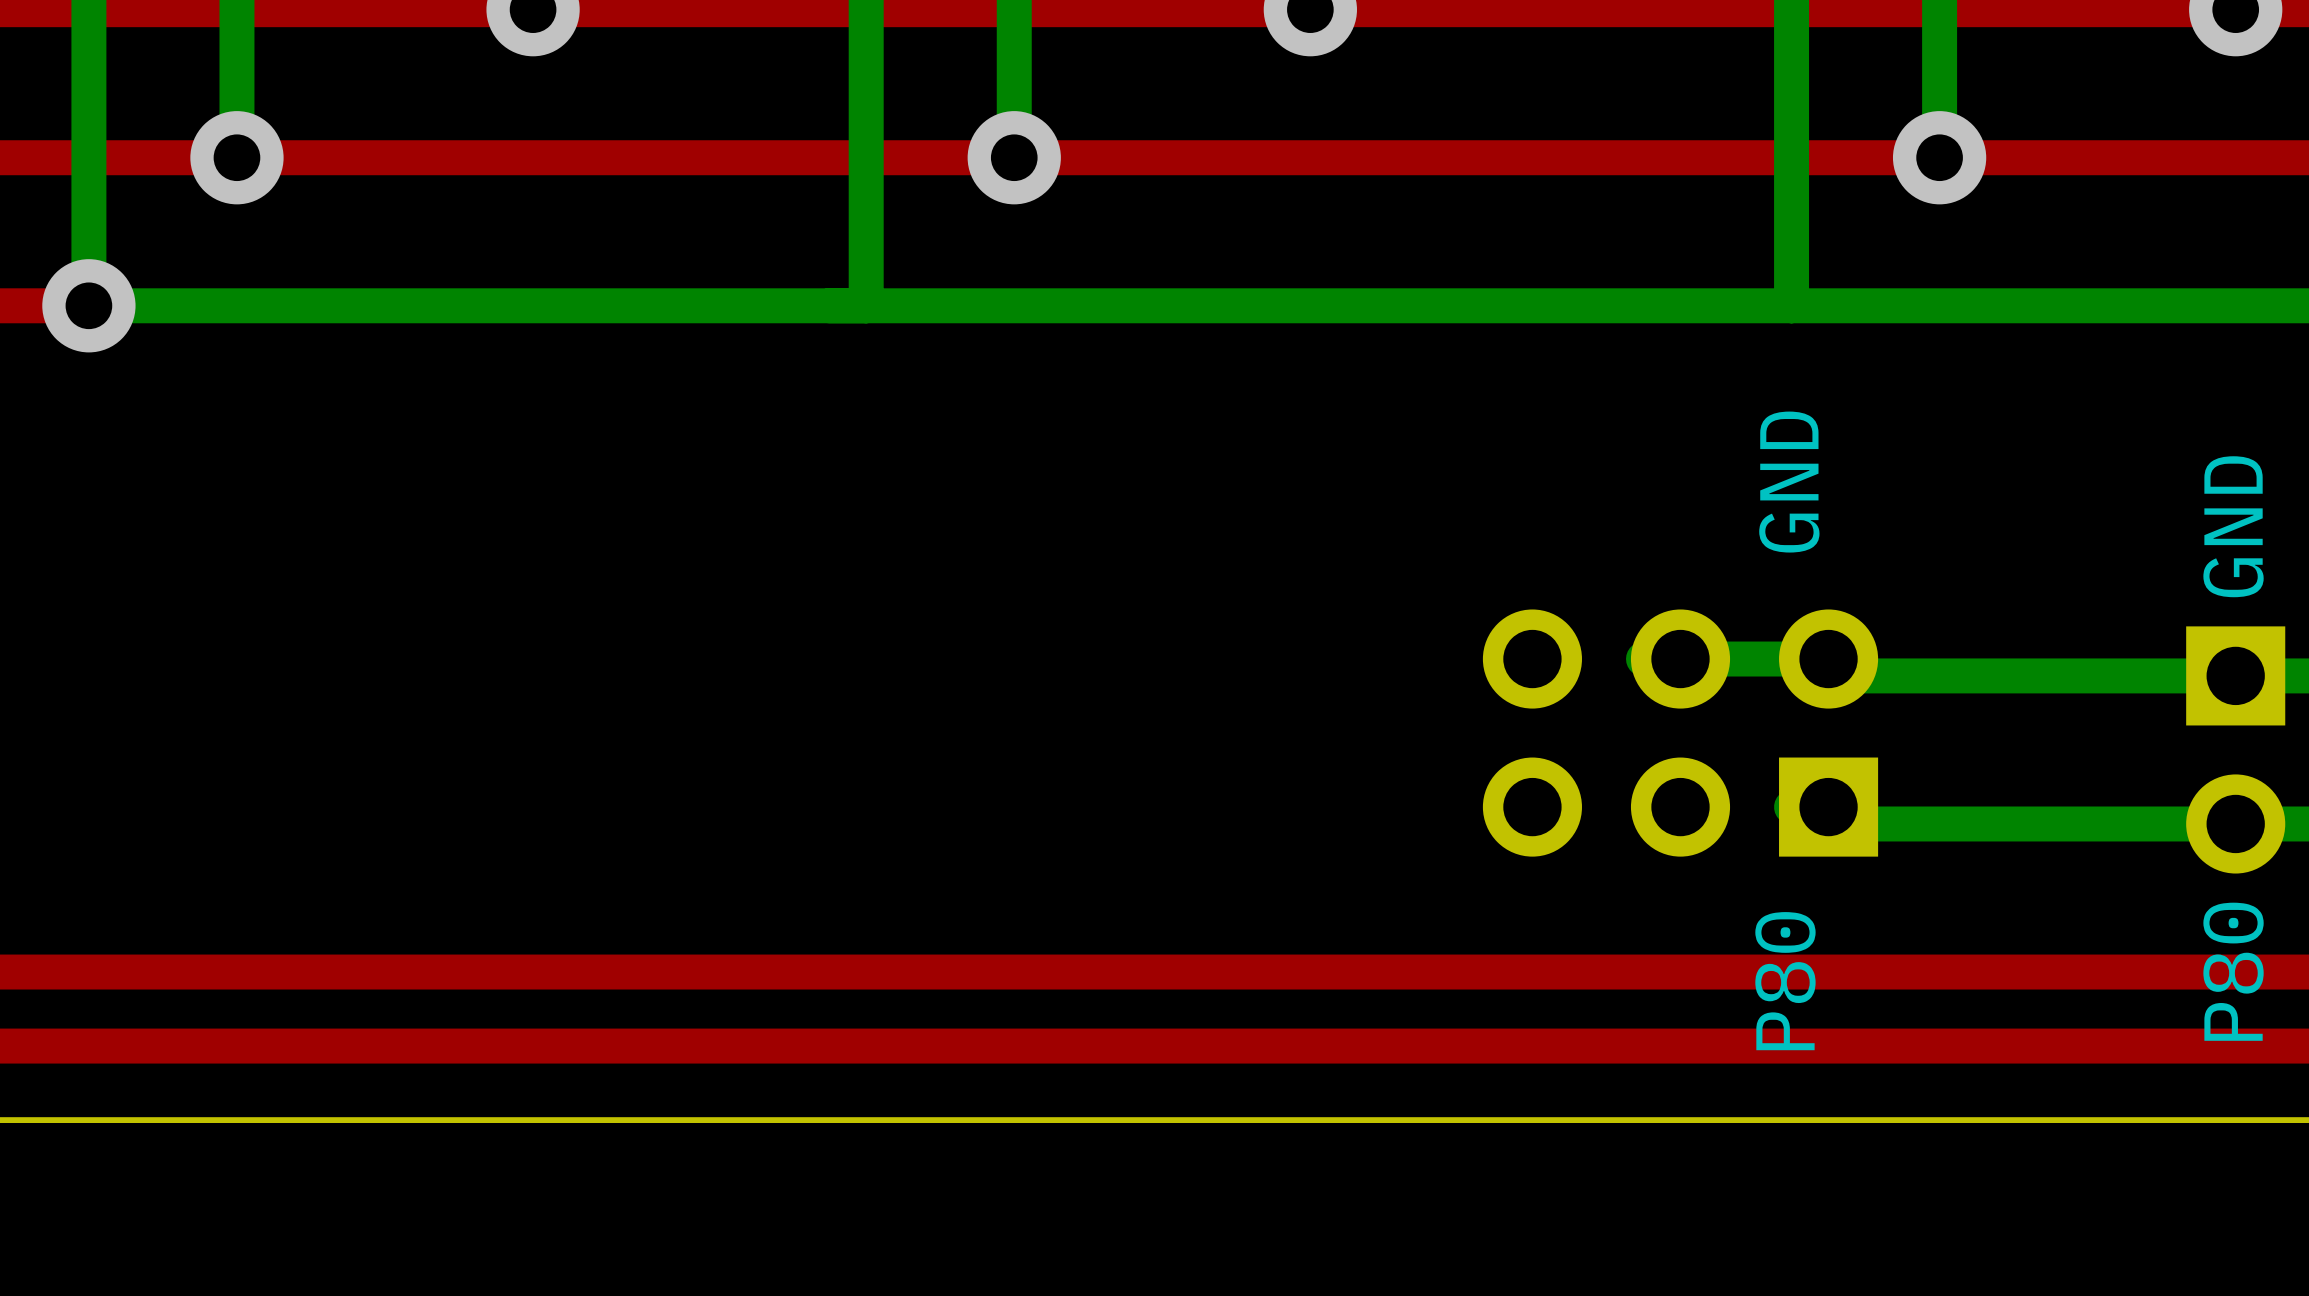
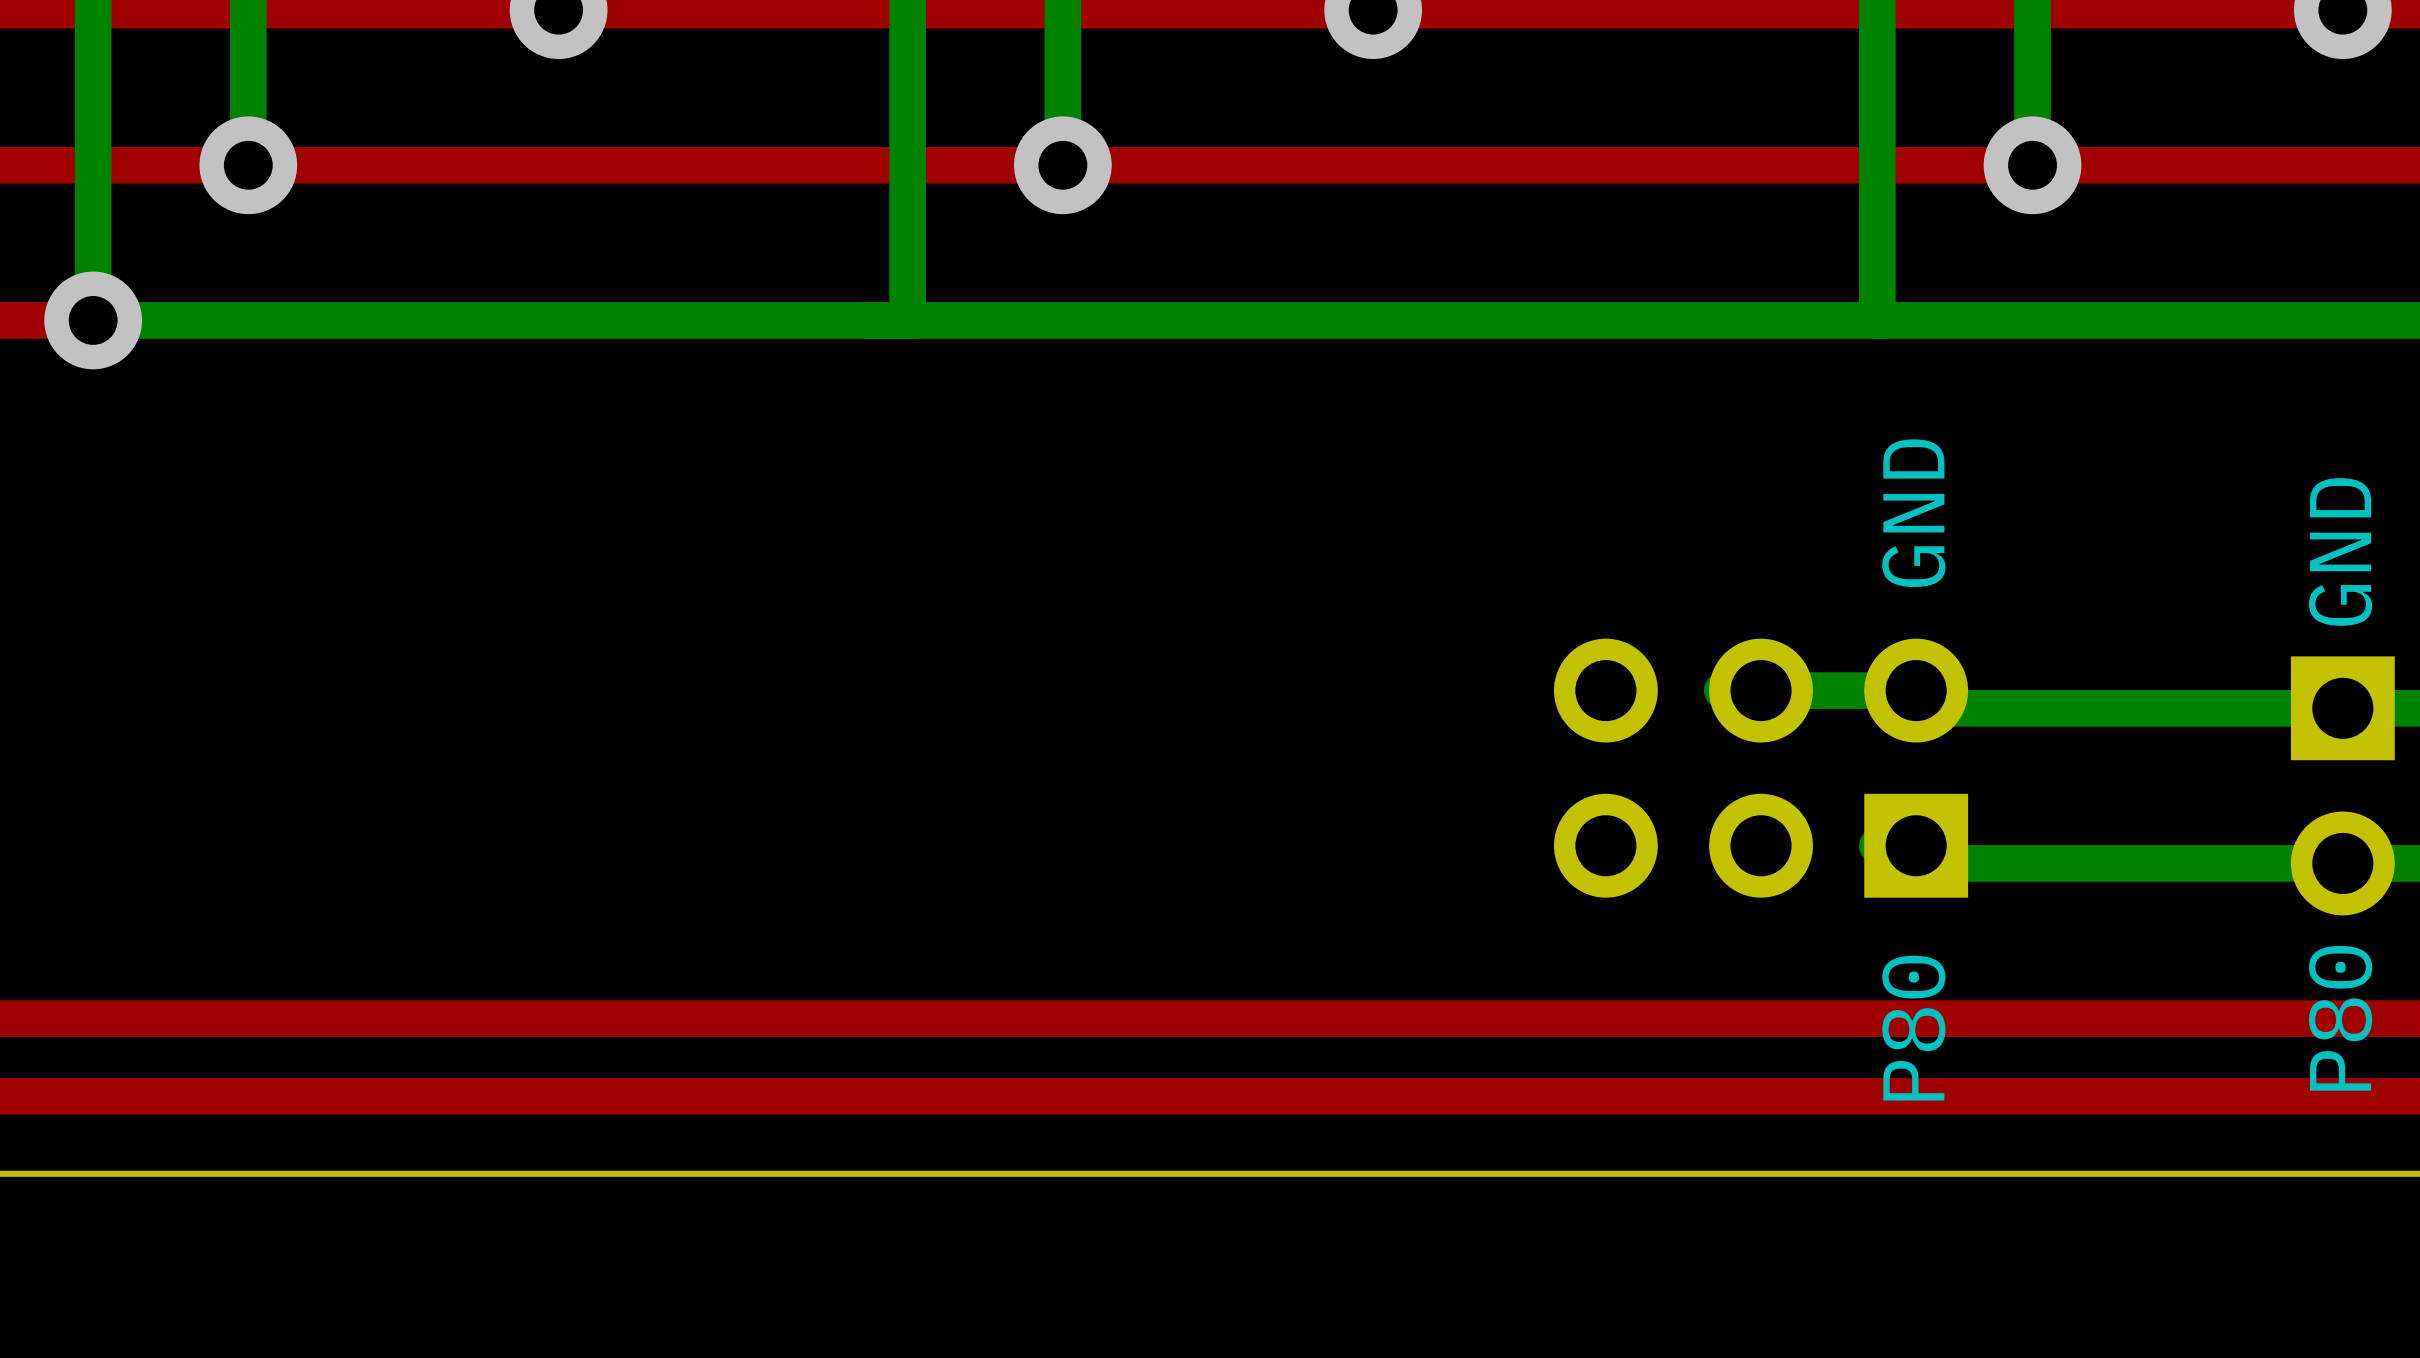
text position: GND (1789, 482) -> GND (1913, 513)
text position: P80 (1785, 981) -> P80 (1913, 1028)

